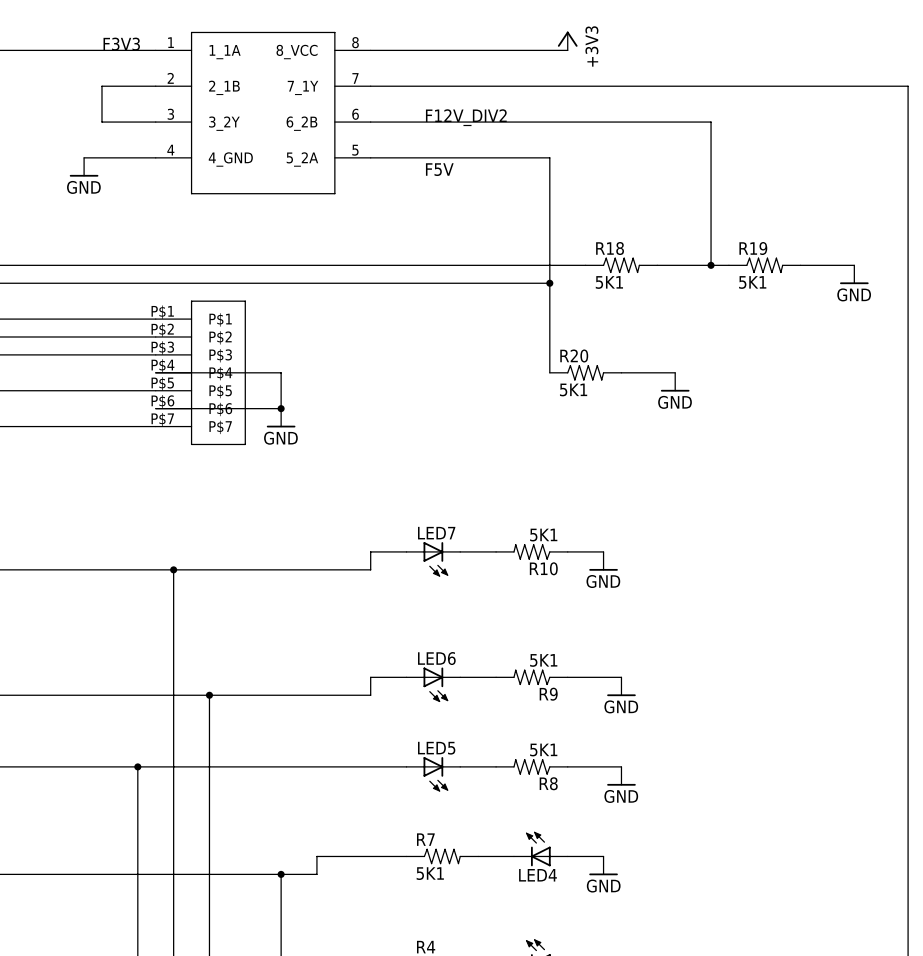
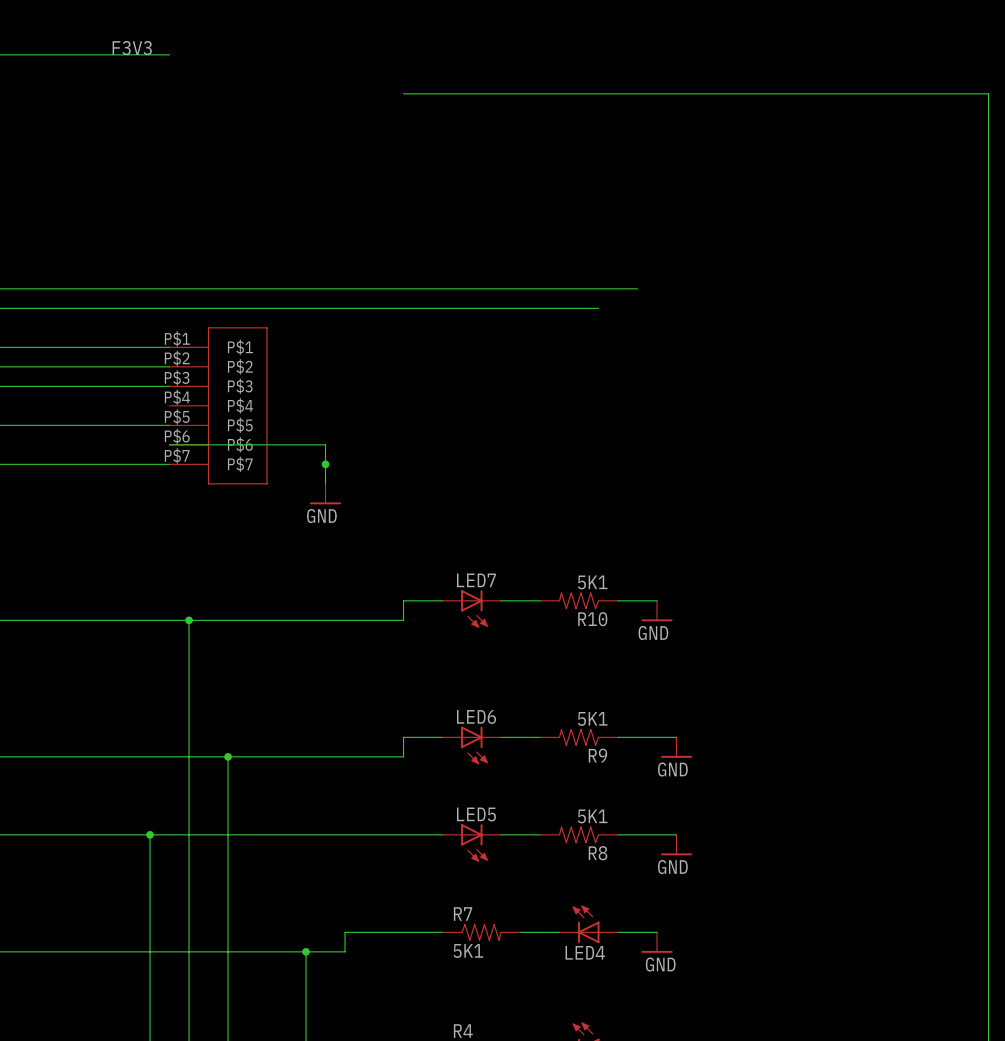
power symbol: +3V3 (567, 40) -> none
wire: (370, 50) (567, 50) -> none
wire: (155, 86) (101, 86) (101, 122) (155, 122) -> none
part: (263, 113) -> none
label: F12V_DIV2 (466, 117) -> none
wire: (370, 122) (711, 122) (711, 265) -> none
wire: (84, 157) (155, 157) -> none
wire: (370, 157) (549, 157) (549, 372) -> none
power symbol: GND (84, 167) -> none
label: F5V (439, 169) -> none
R18: 5K1 (621, 265) -> none
wire: (657, 265) (728, 265) -> none
junction: (711, 265) -> none
R19: 5K1 (764, 265) -> none
wire: (800, 265) (854, 265) -> none
power symbol: GND (854, 274) -> none
junction: (549, 283) -> none
wire: (155, 372) (281, 372) (281, 408) -> (325, 483) (325, 444) (306, 444)
R20: 5K1 (585, 372) -> none
wire: (621, 372) (675, 372) -> none
power symbol: GND (675, 382) -> none
junction position: (281, 408) -> (325, 464)
power symbol position: GND (281, 418) -> GND (325, 494)

